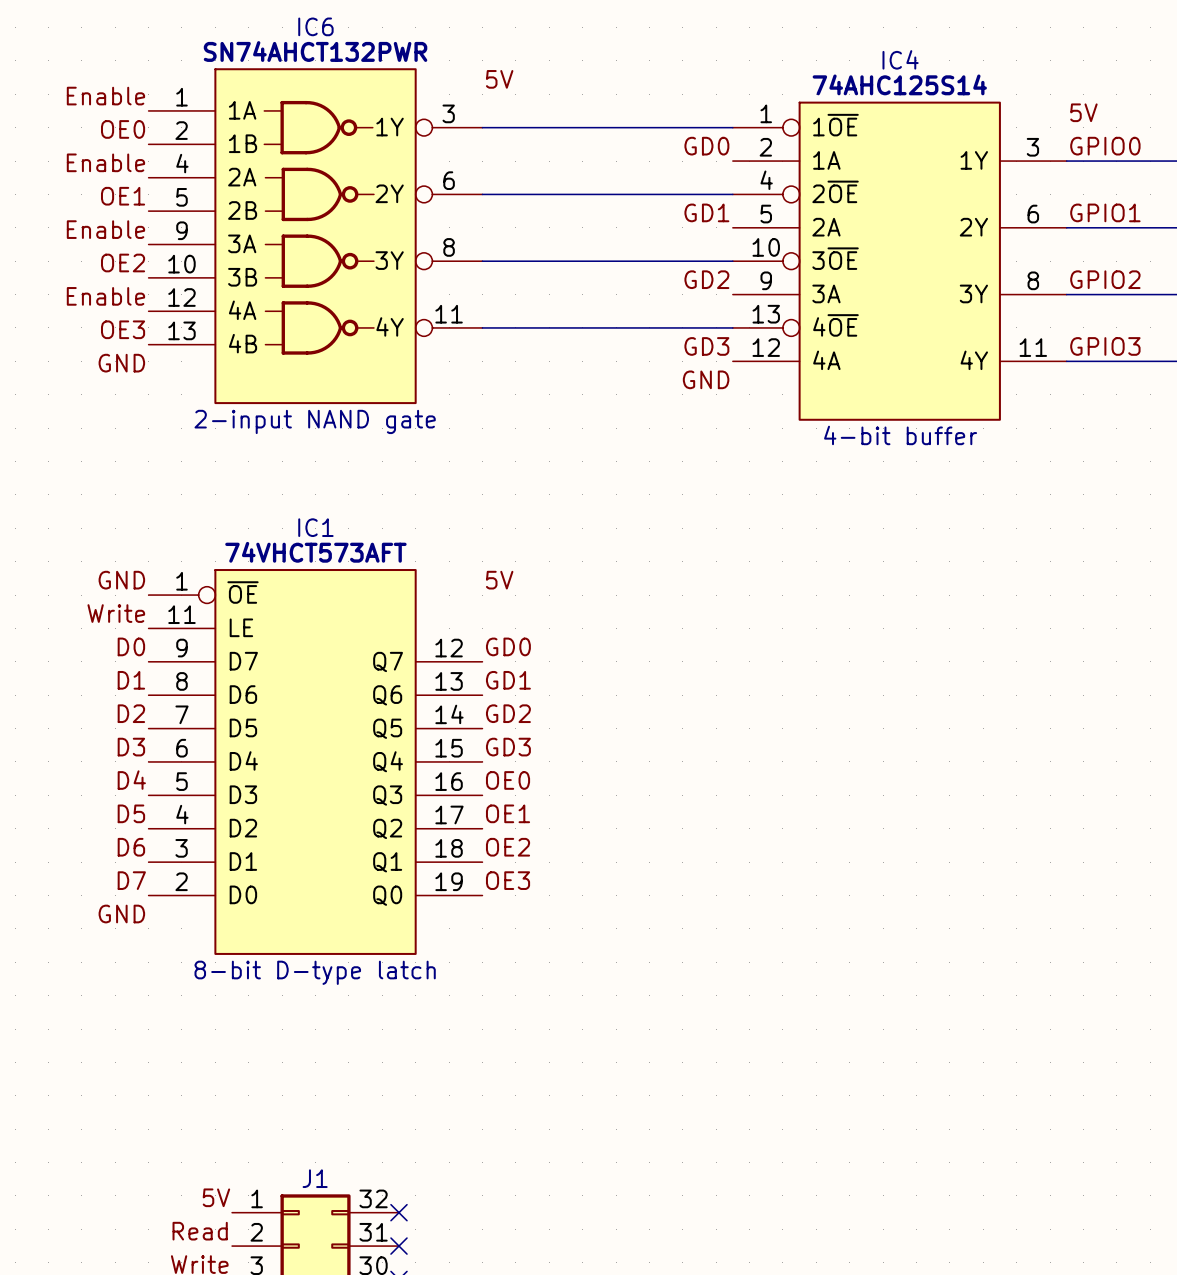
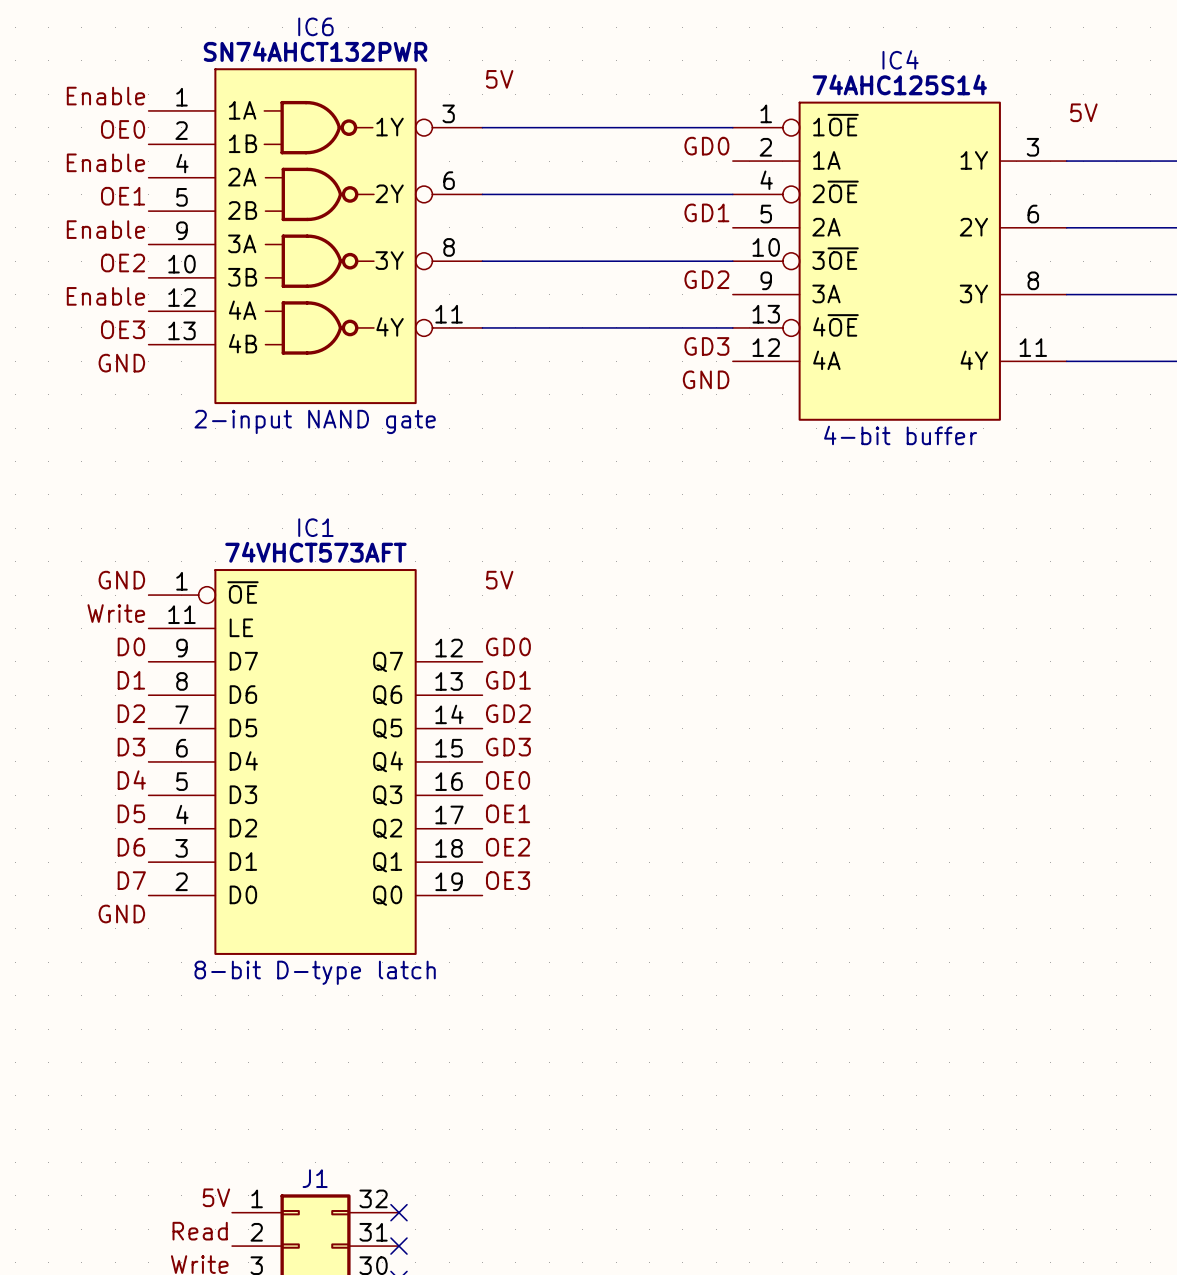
label: GPIO0 (1105, 146) -> none
label: GPIO1 (1105, 212) -> none
label: GPIO2 (1105, 279) -> none
label: GPIO3 (1105, 346) -> none

